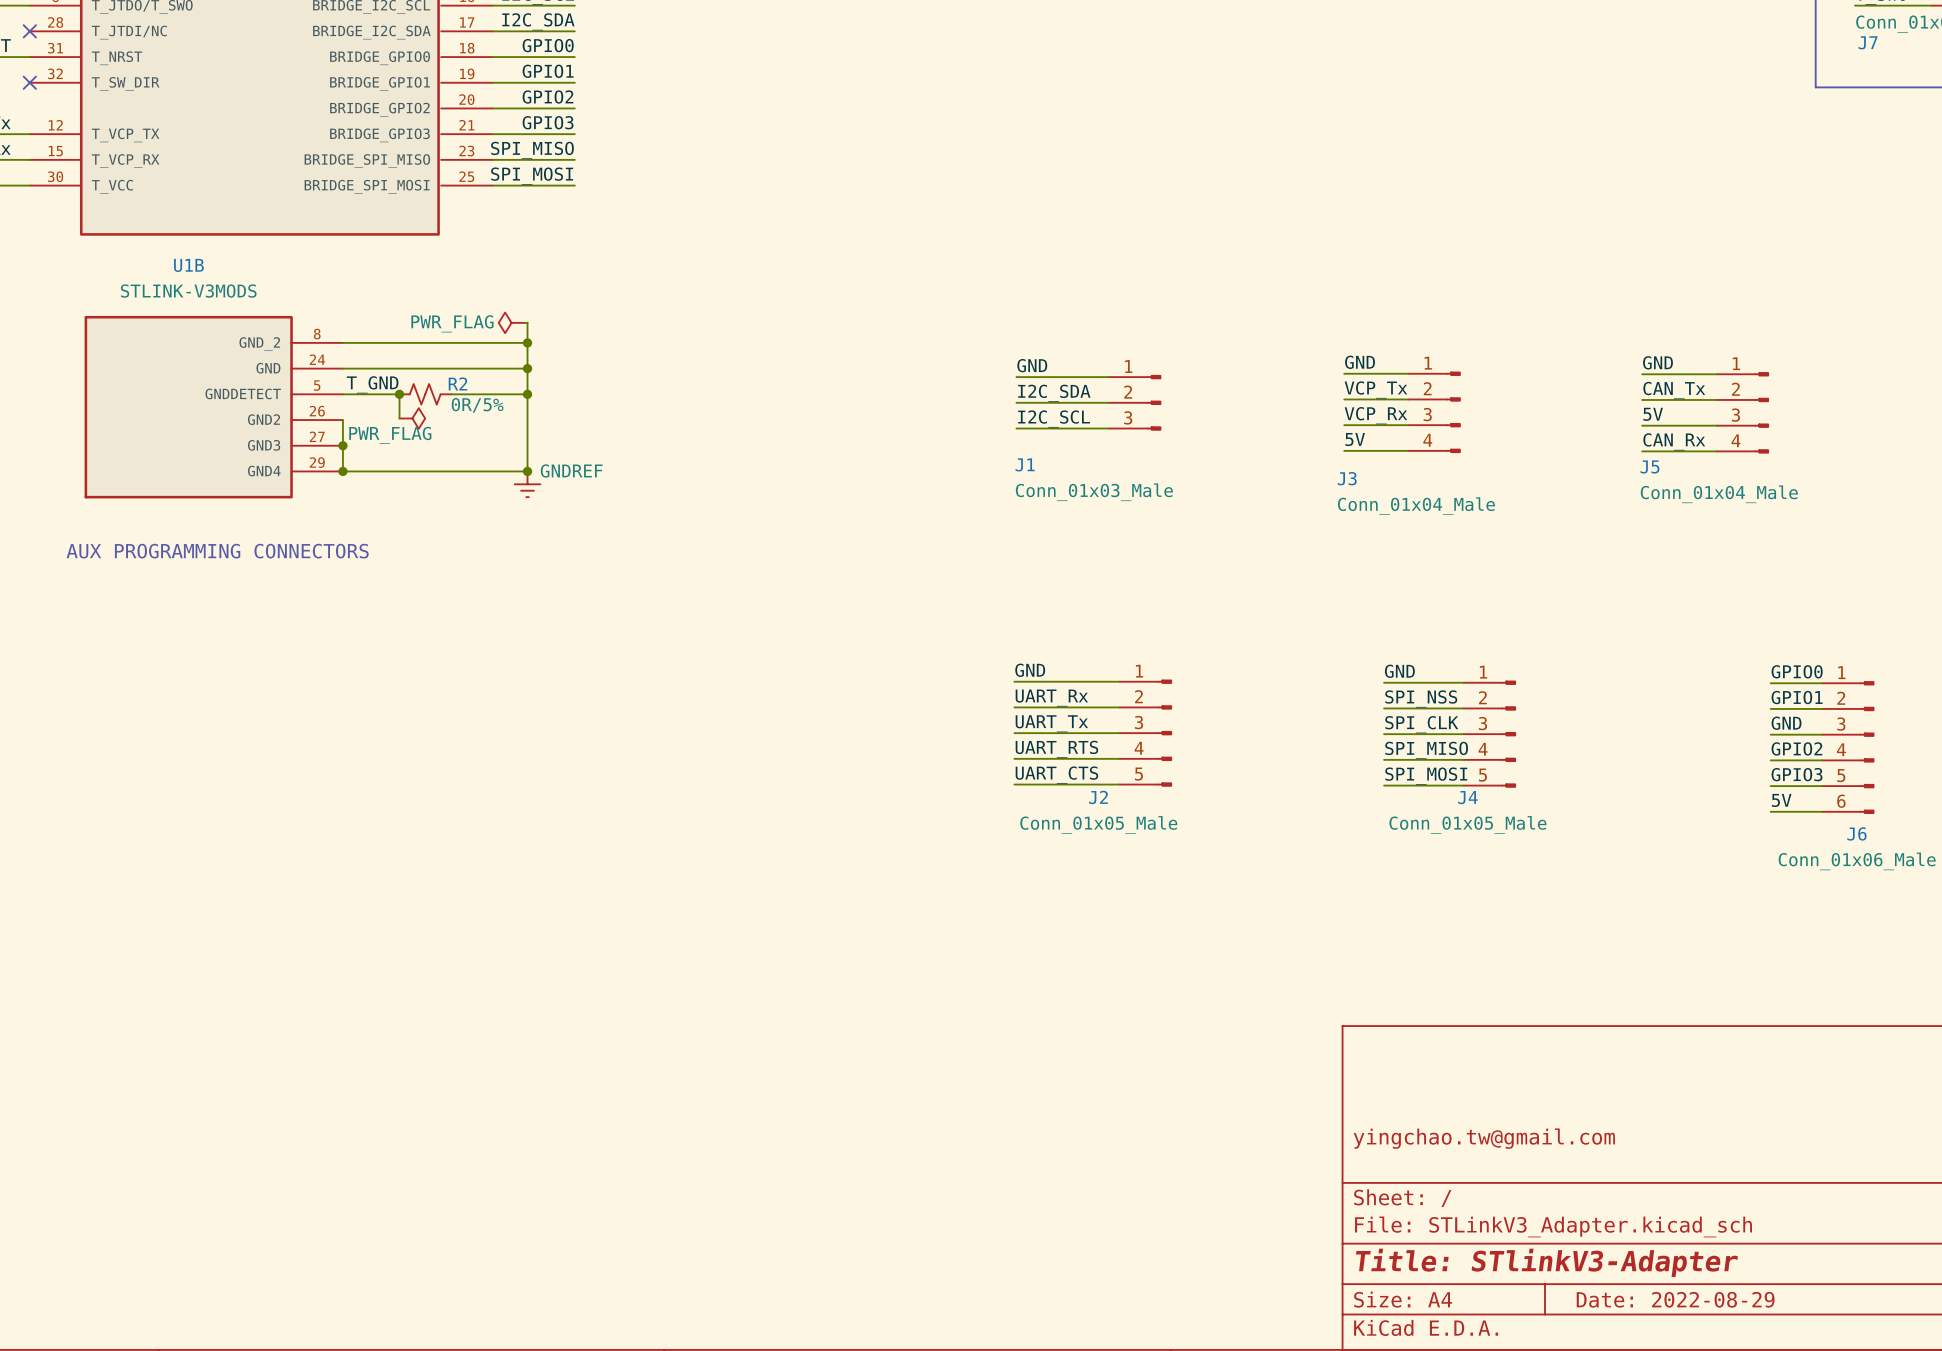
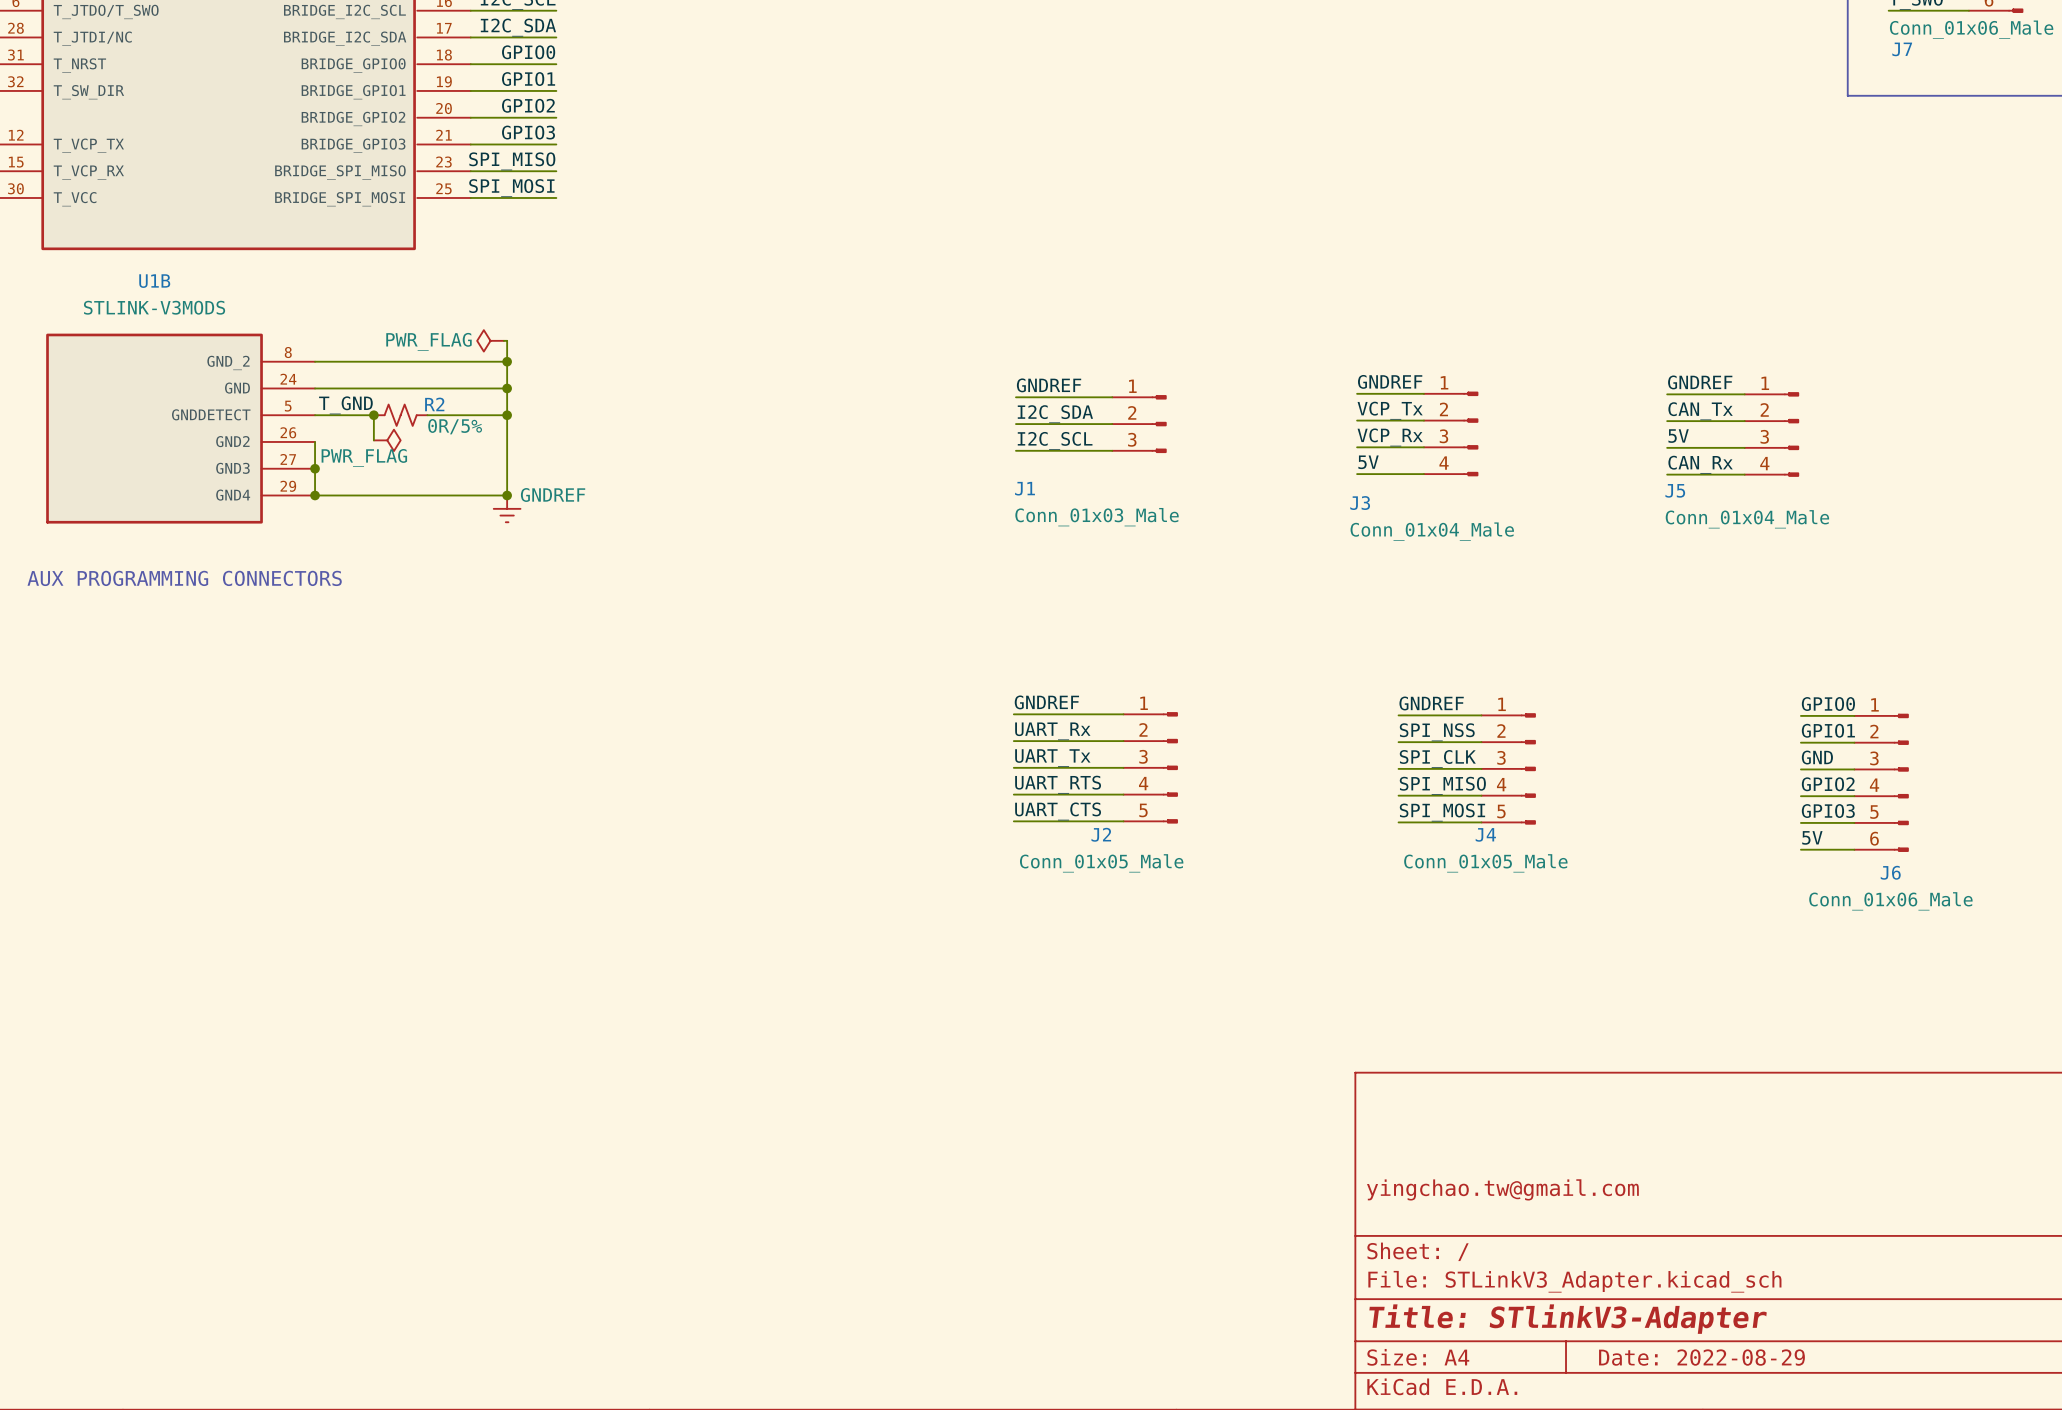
label: GND (1360, 362) -> GNDREF (1390, 381)
label: GND (1657, 362) -> GNDREF (1700, 382)
label: GND (1032, 365) -> GNDREF (1049, 385)
label: GND (1030, 670) -> GNDREF (1046, 702)
label: GND (1399, 671) -> GNDREF (1431, 703)

